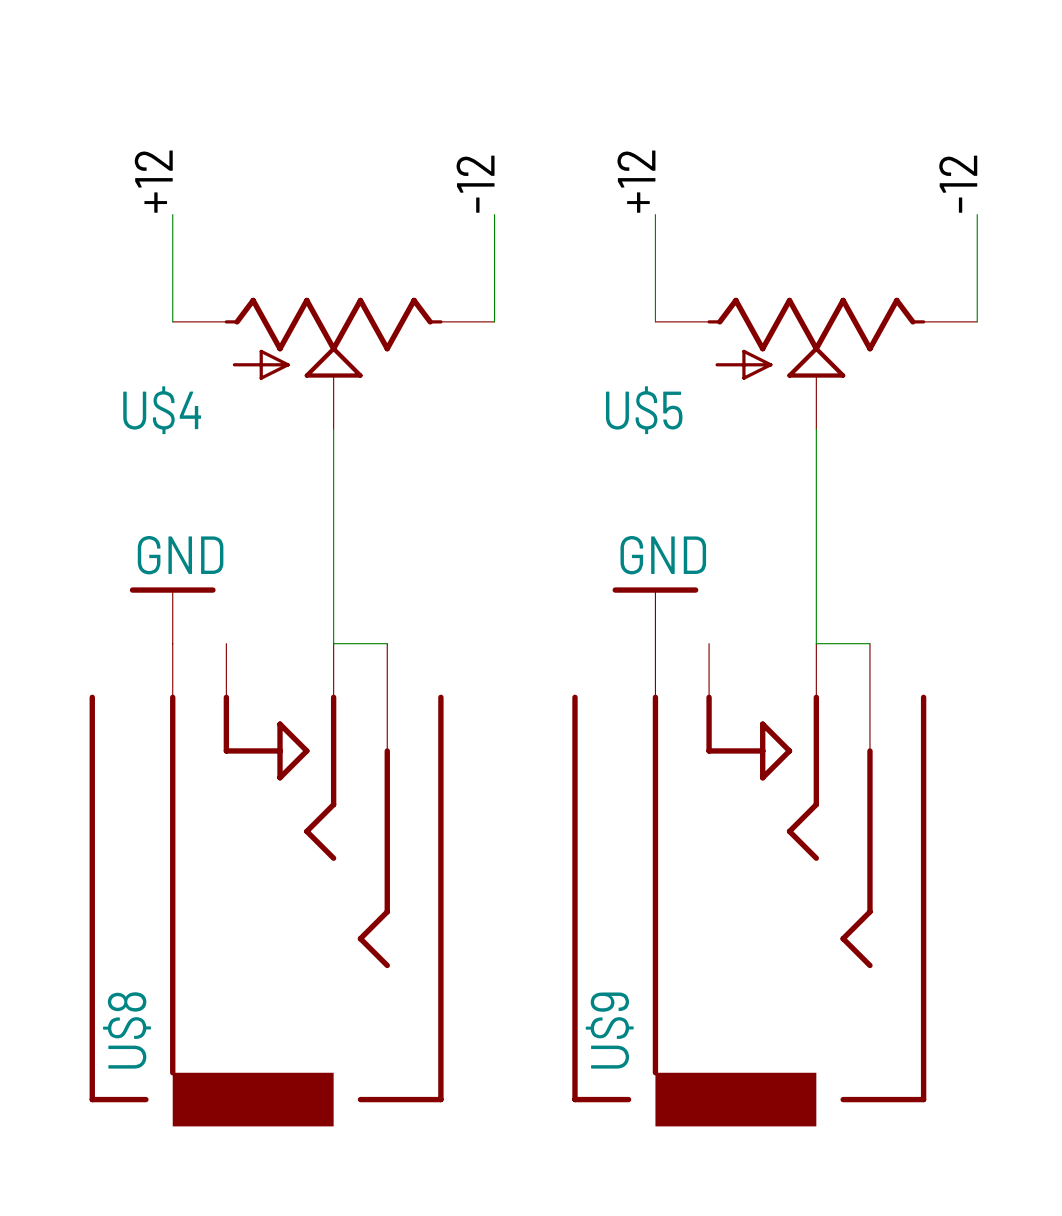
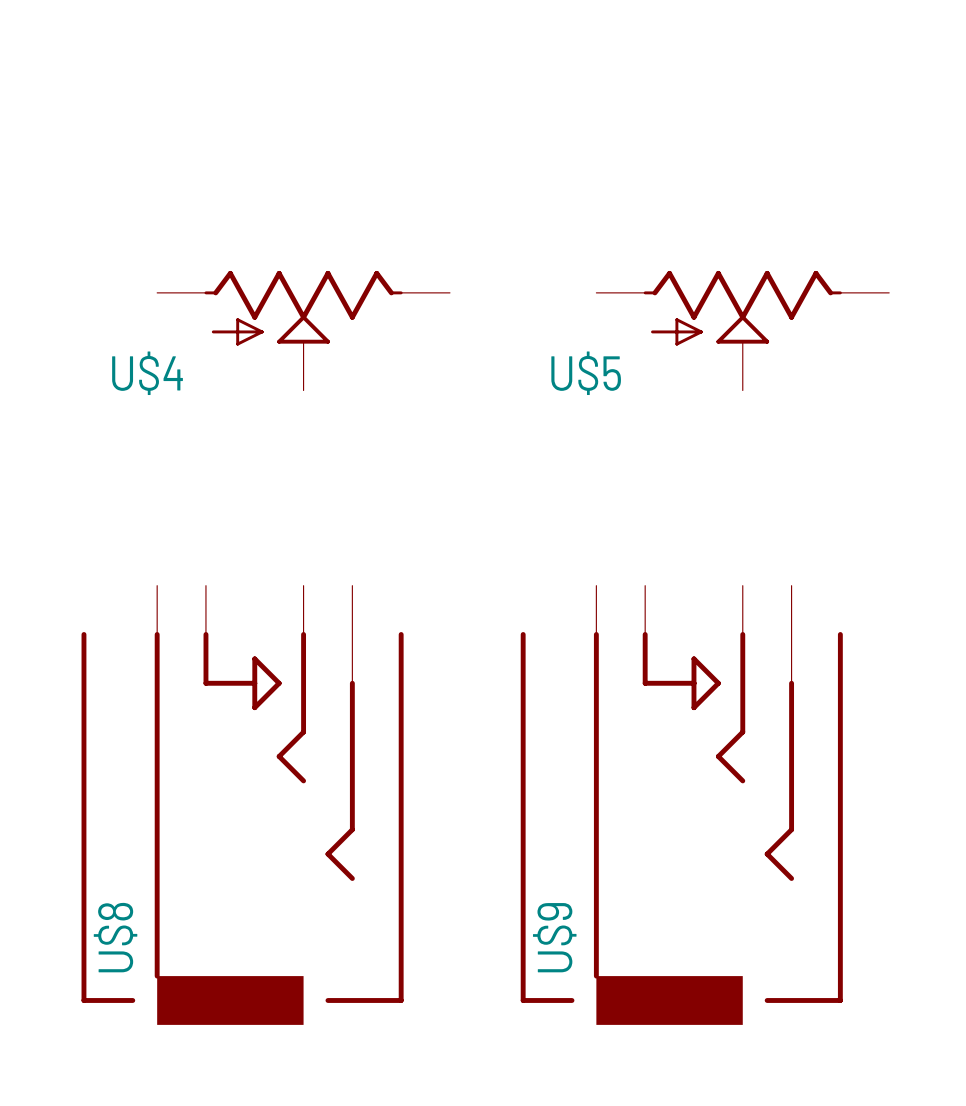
label: +12 (153, 181) -> none
label: +12 (636, 181) -> none
label: -12 (475, 184) -> none
label: -12 (958, 184) -> none
wire: (172, 214) (172, 321) -> none
wire: (494, 214) (494, 321) -> none
wire: (655, 214) (655, 321) -> none
wire: (977, 214) (977, 321) -> none
wire: (333, 429) (333, 643) (387, 643) -> none
wire: (816, 429) (816, 643) (869, 643) -> none
power symbol: GND (172, 615) -> none
power symbol: GND (655, 615) -> none

